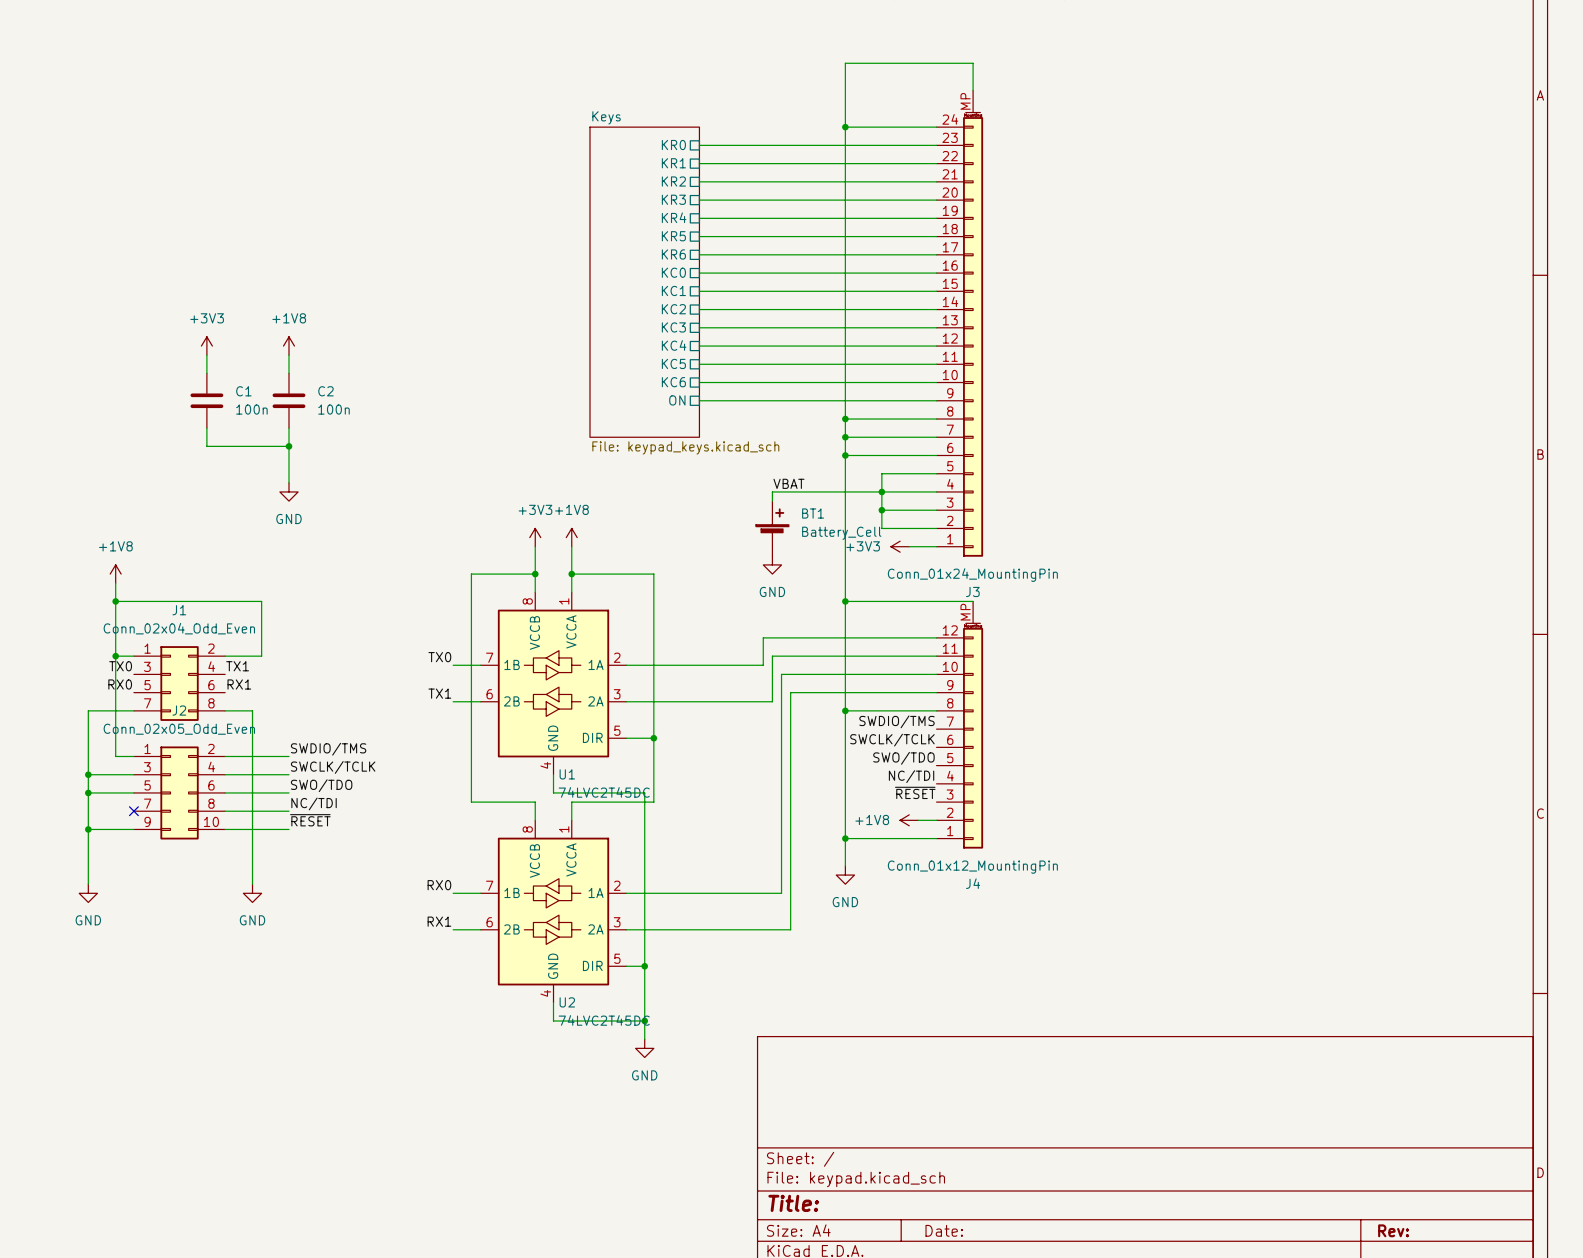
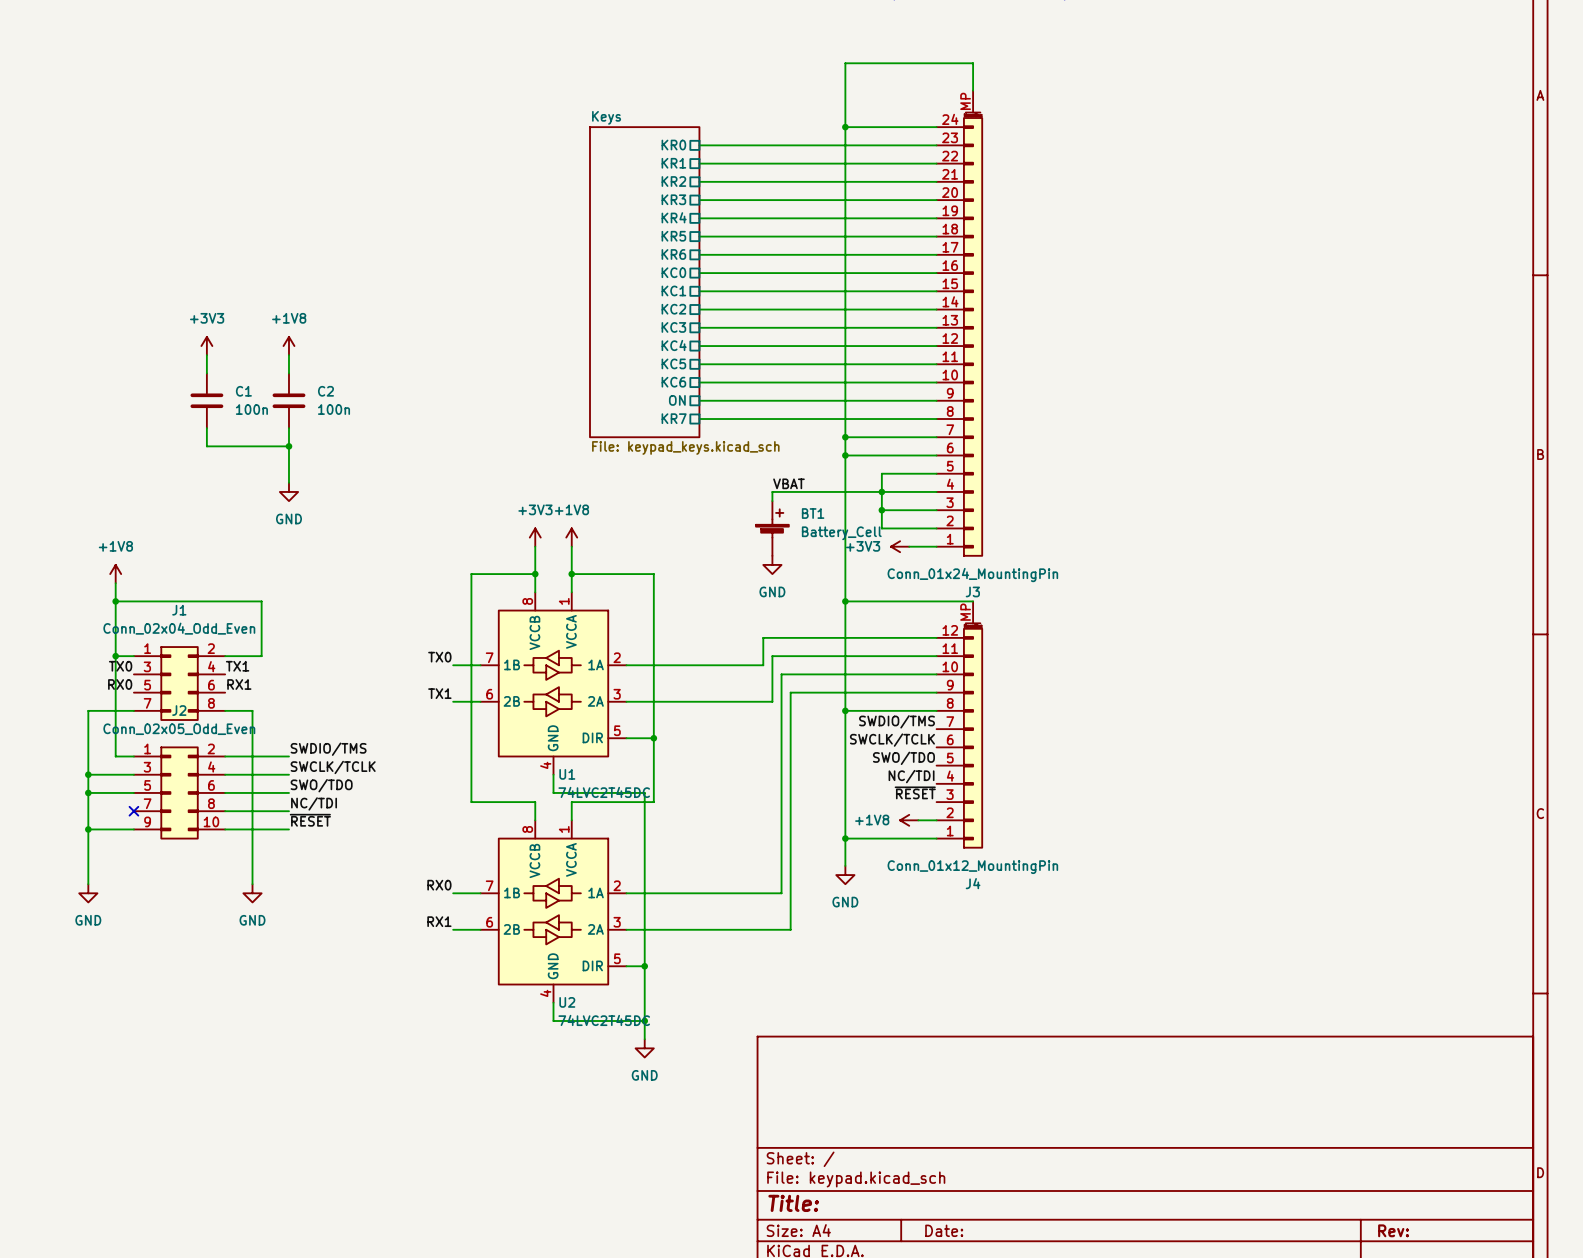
sheet pin: none -> KR7 (674, 418)
wire: none -> (699, 419) (845, 419)
junction: (845, 419) -> none

